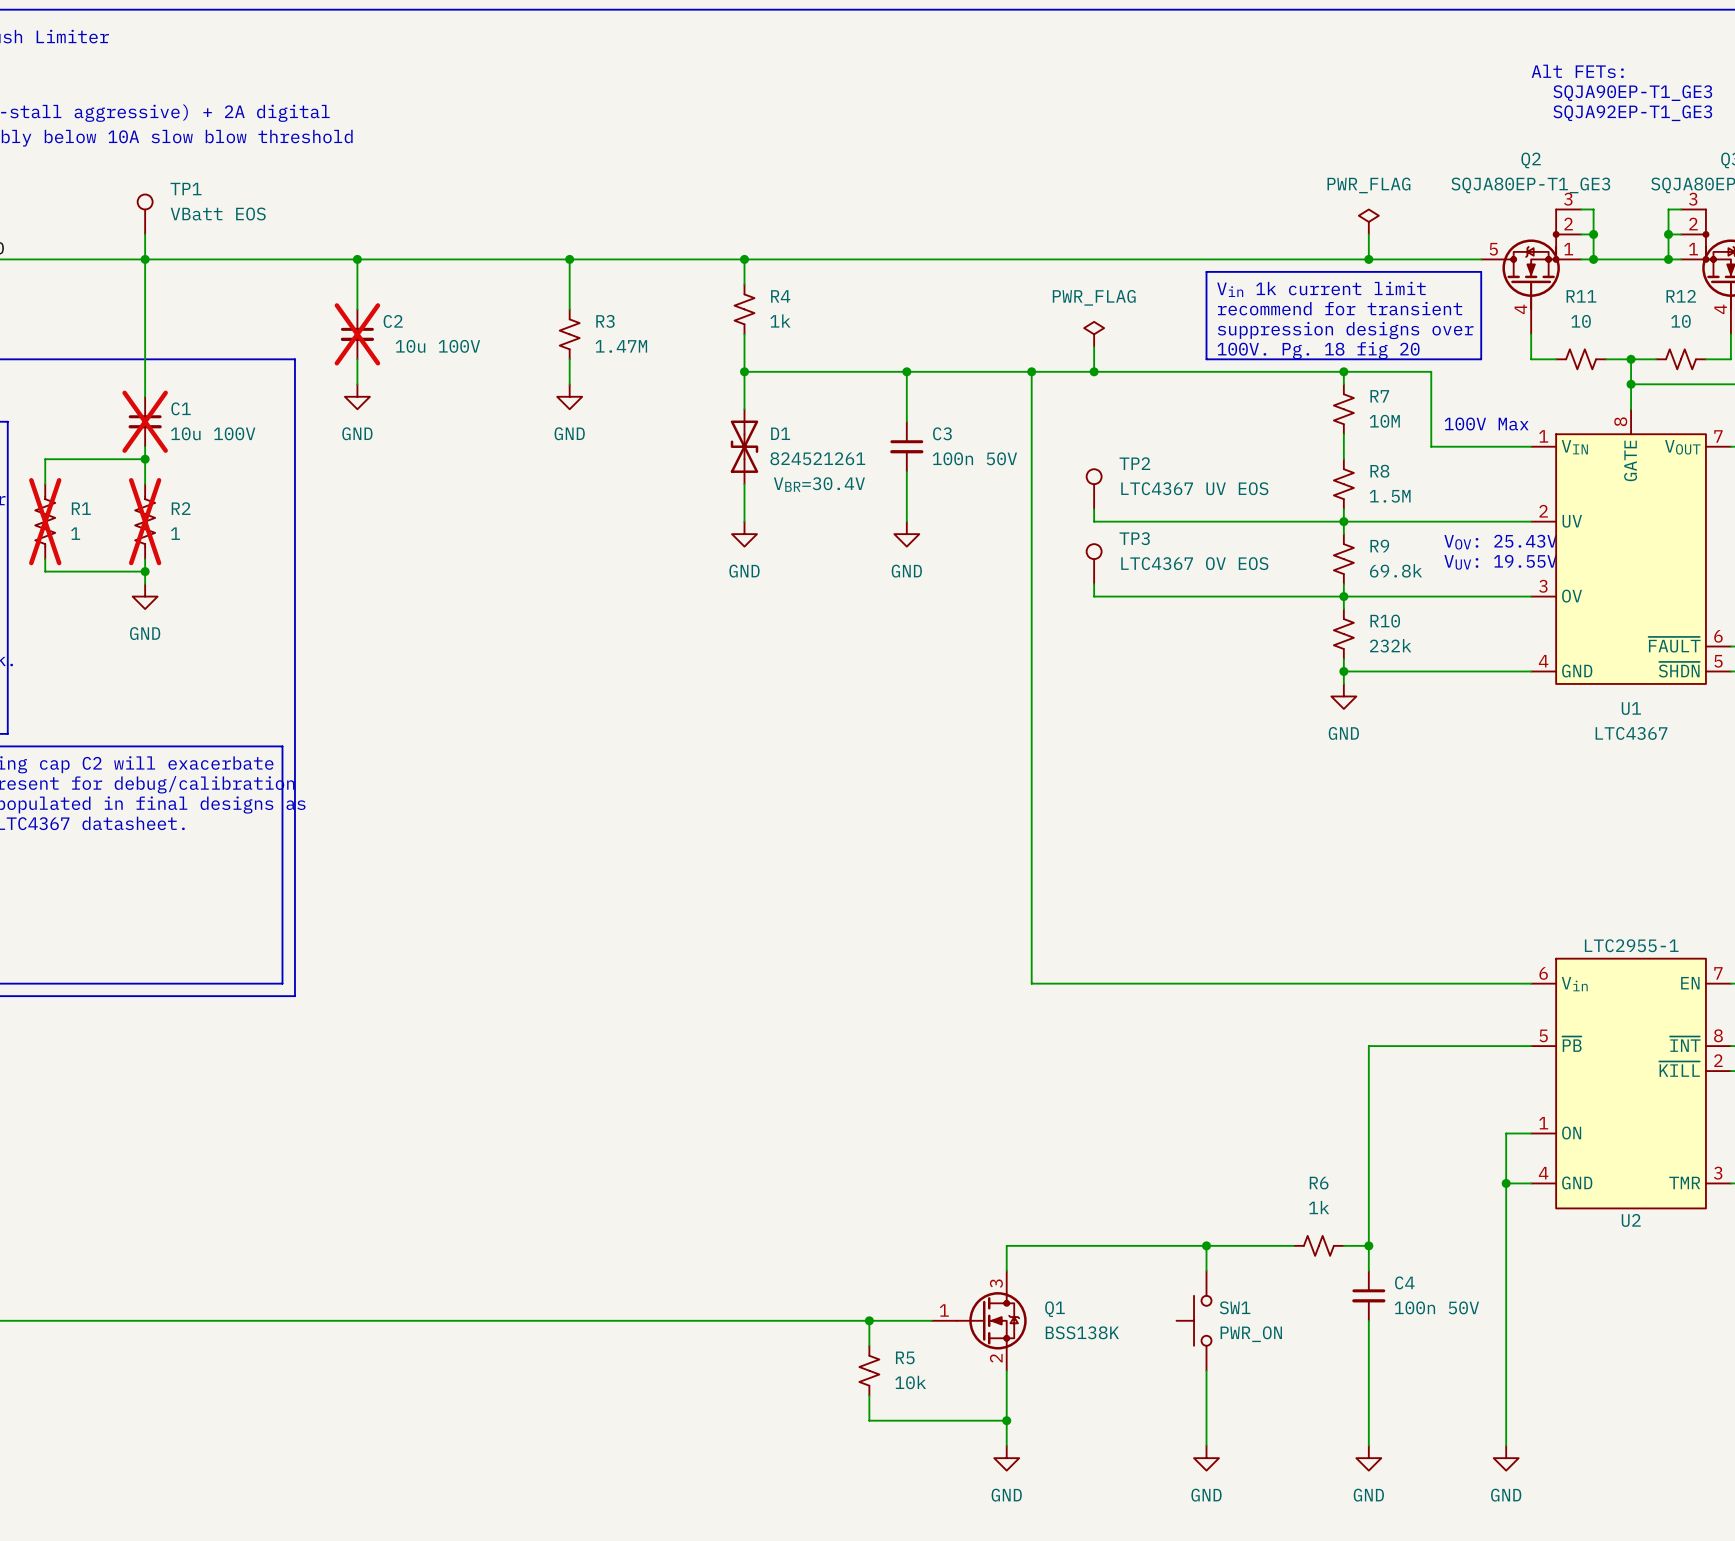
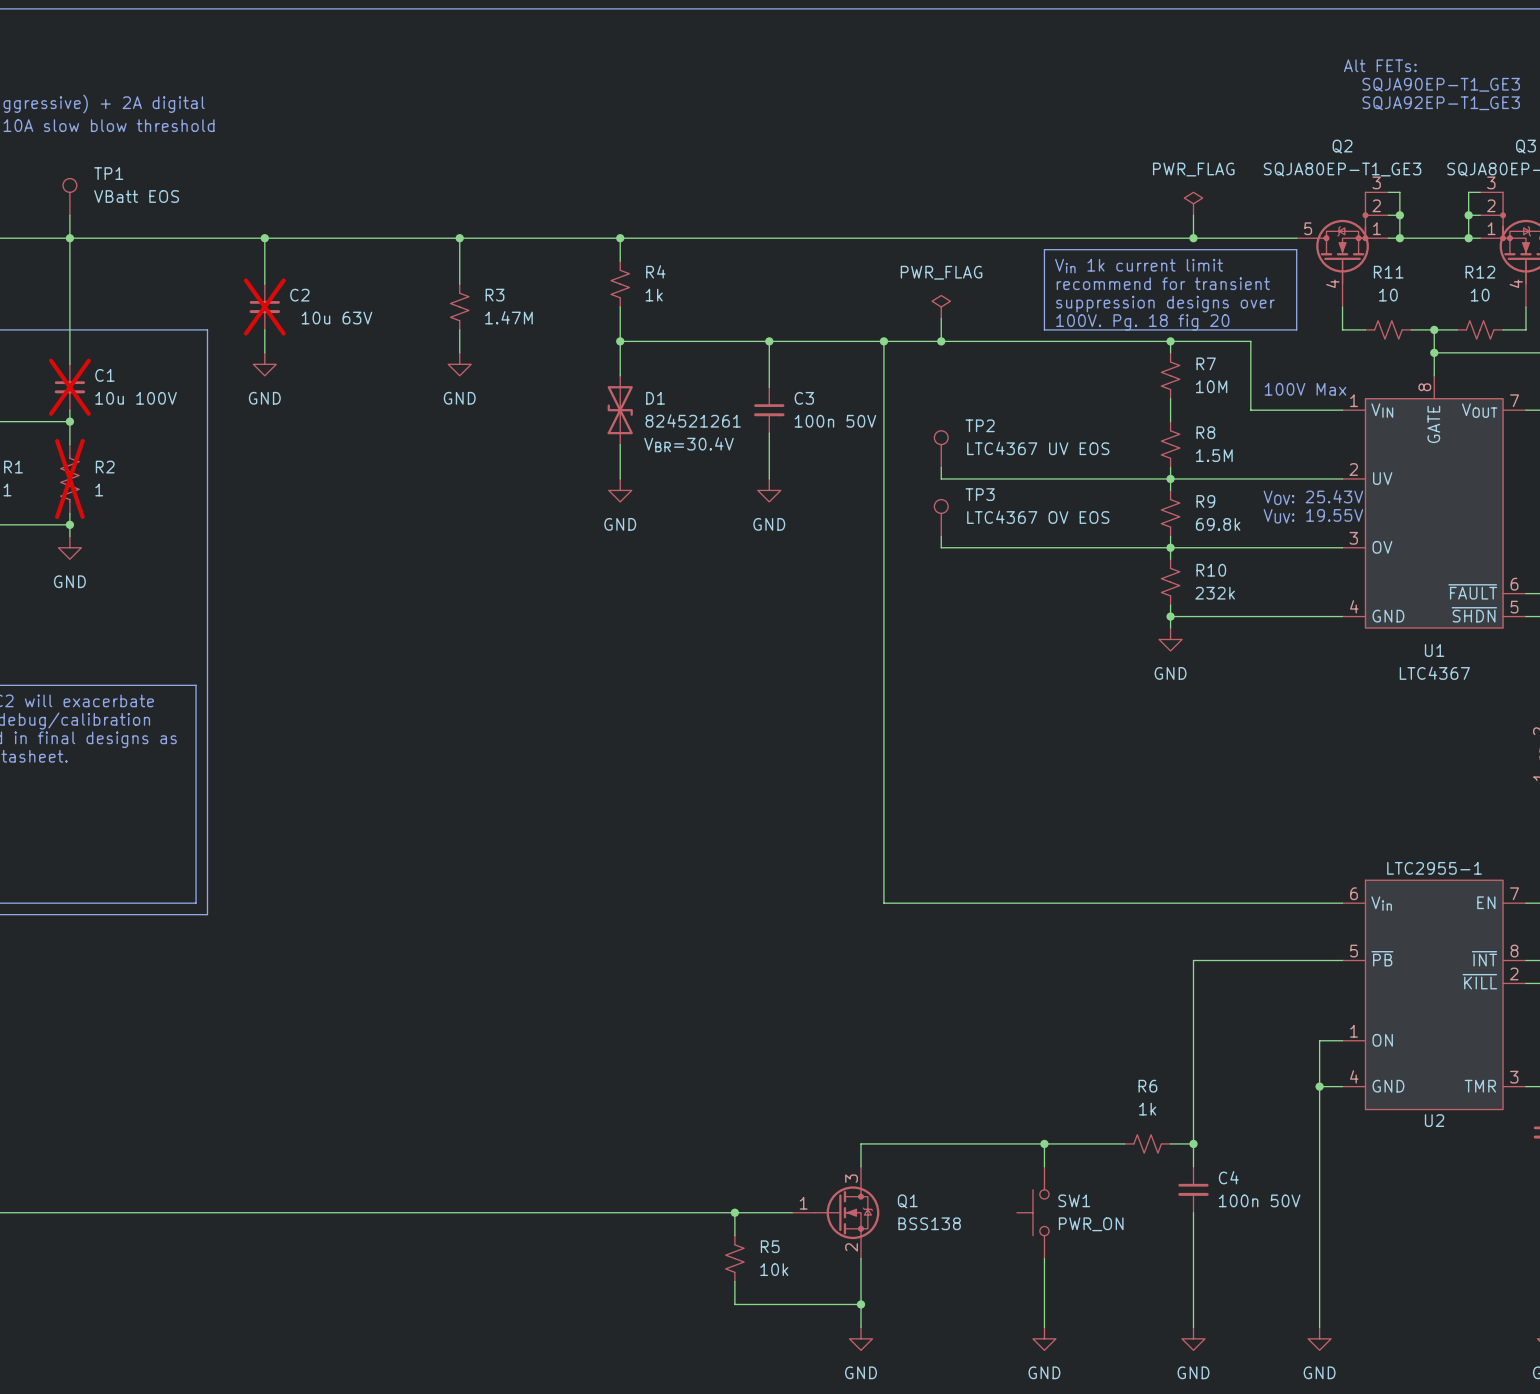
C2 value: 10u 100V (437, 346) -> 10u 63V (336, 318)
Q1 value: BSS138K (1082, 1332) -> BSS138 (929, 1223)

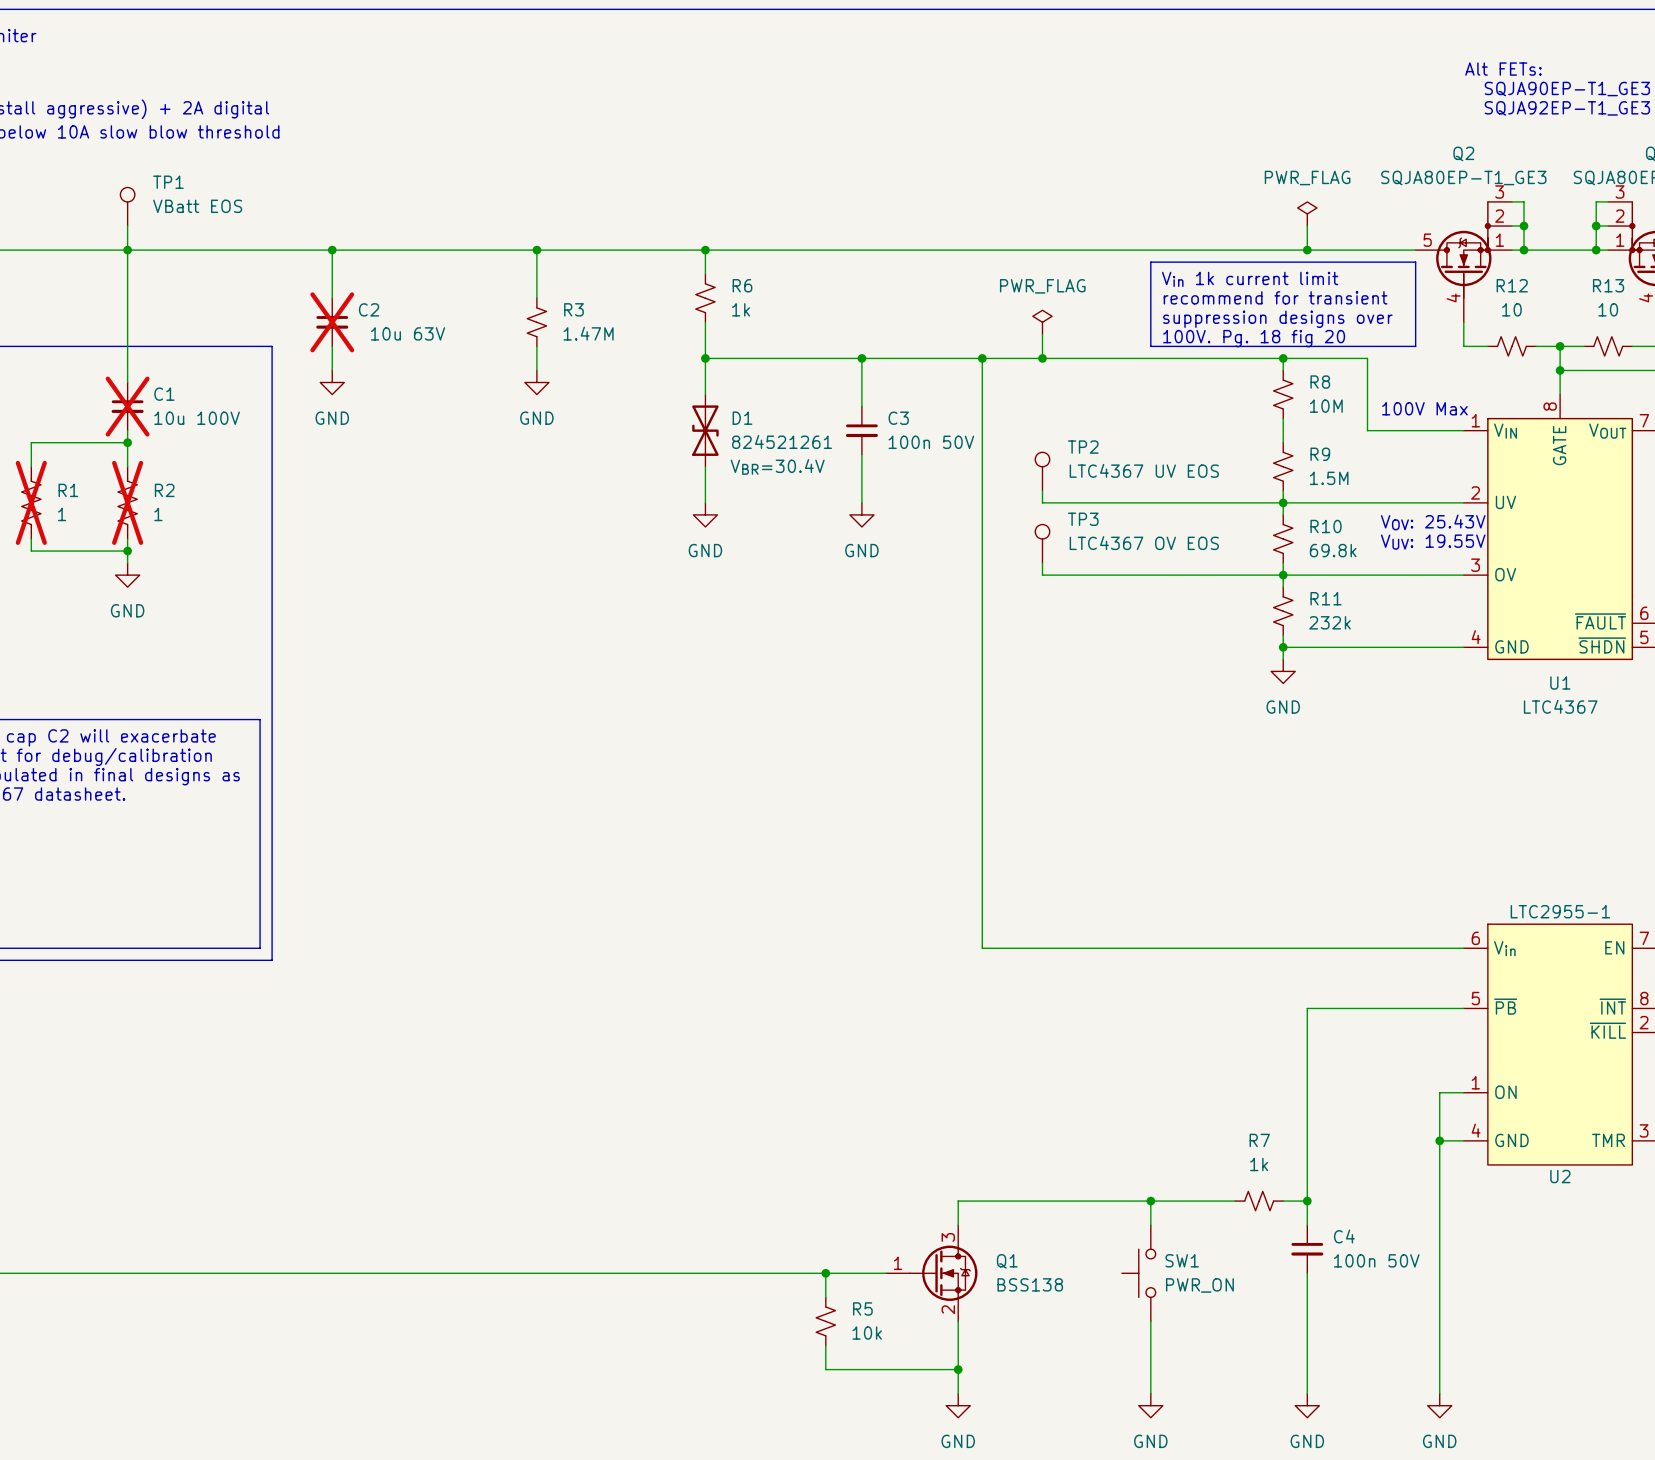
R4 name: R4 (655, 271) -> R6 (742, 285)
R11 name: R11 (1388, 272) -> R12 (1512, 285)
R12 name: R12 (1480, 272) -> R13 (1608, 285)
R7 name: R7 (1206, 363) -> R8 (1320, 382)
R8 name: R8 (1205, 432) -> R9 (1320, 454)
R9 name: R9 (1205, 501) -> R10 (1326, 526)
R10 name: R10 (1211, 570) -> R11 (1326, 598)
R6 name: R6 (1147, 1086) -> R7 (1259, 1140)

